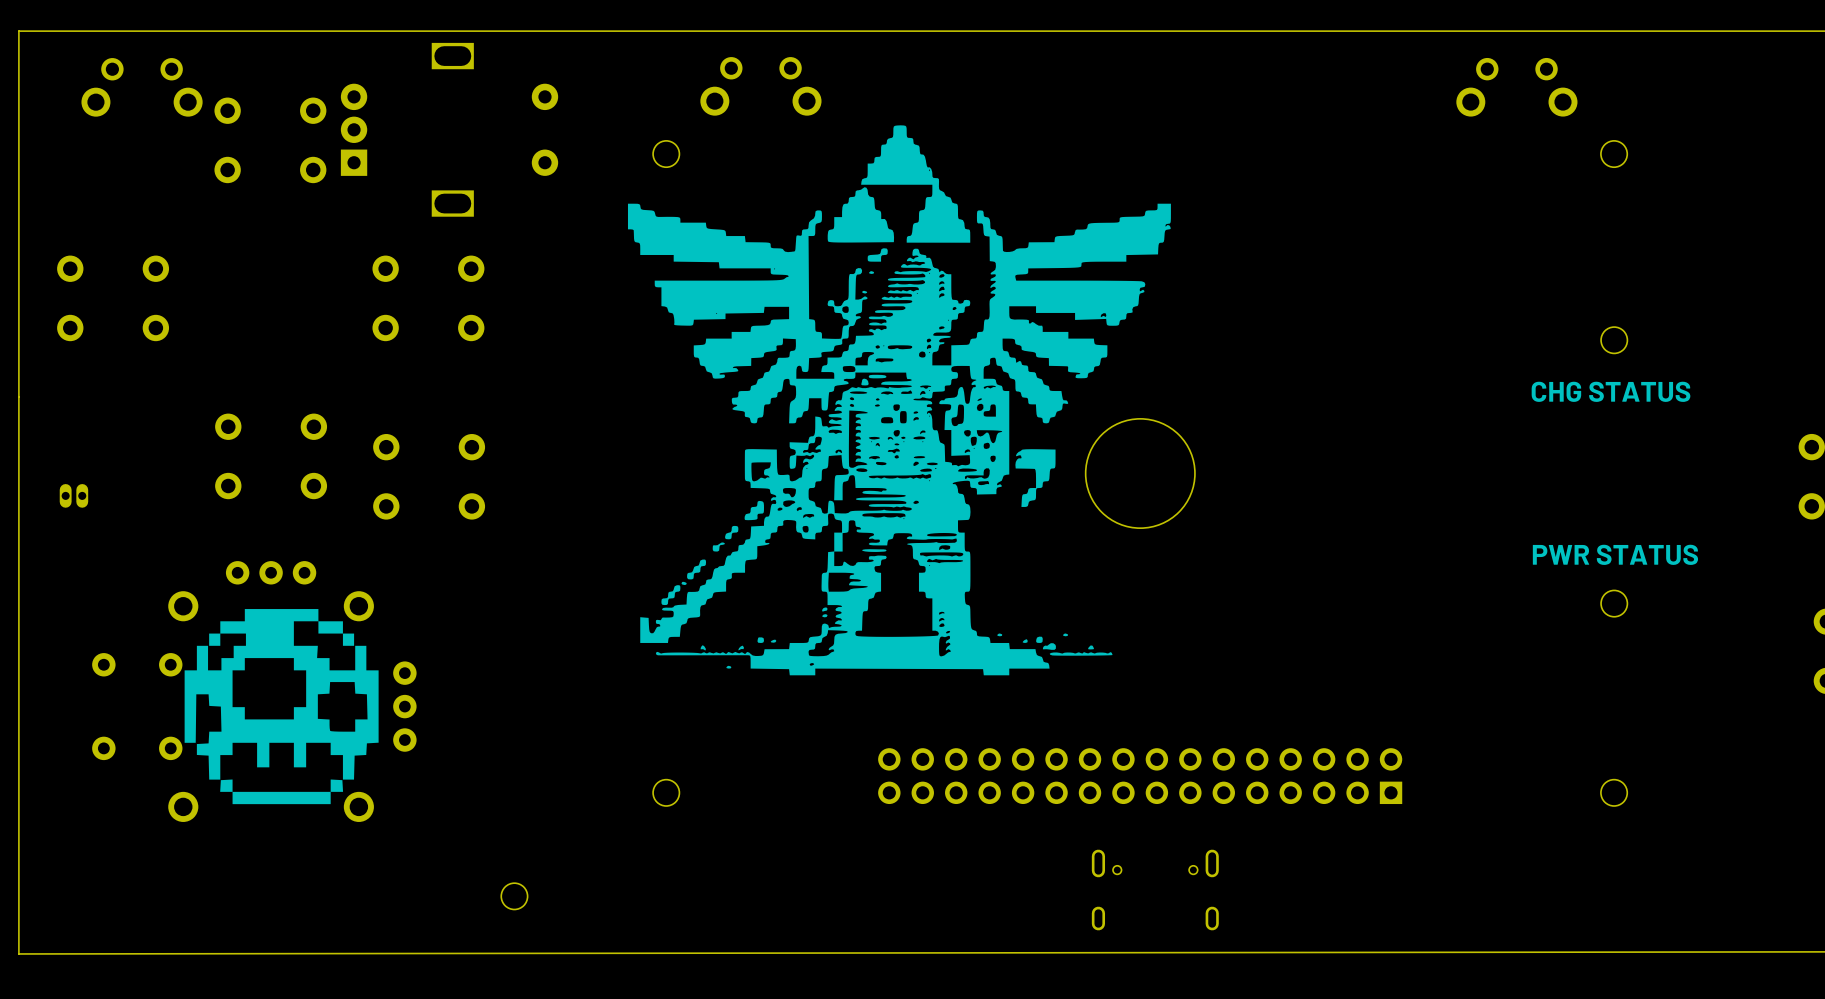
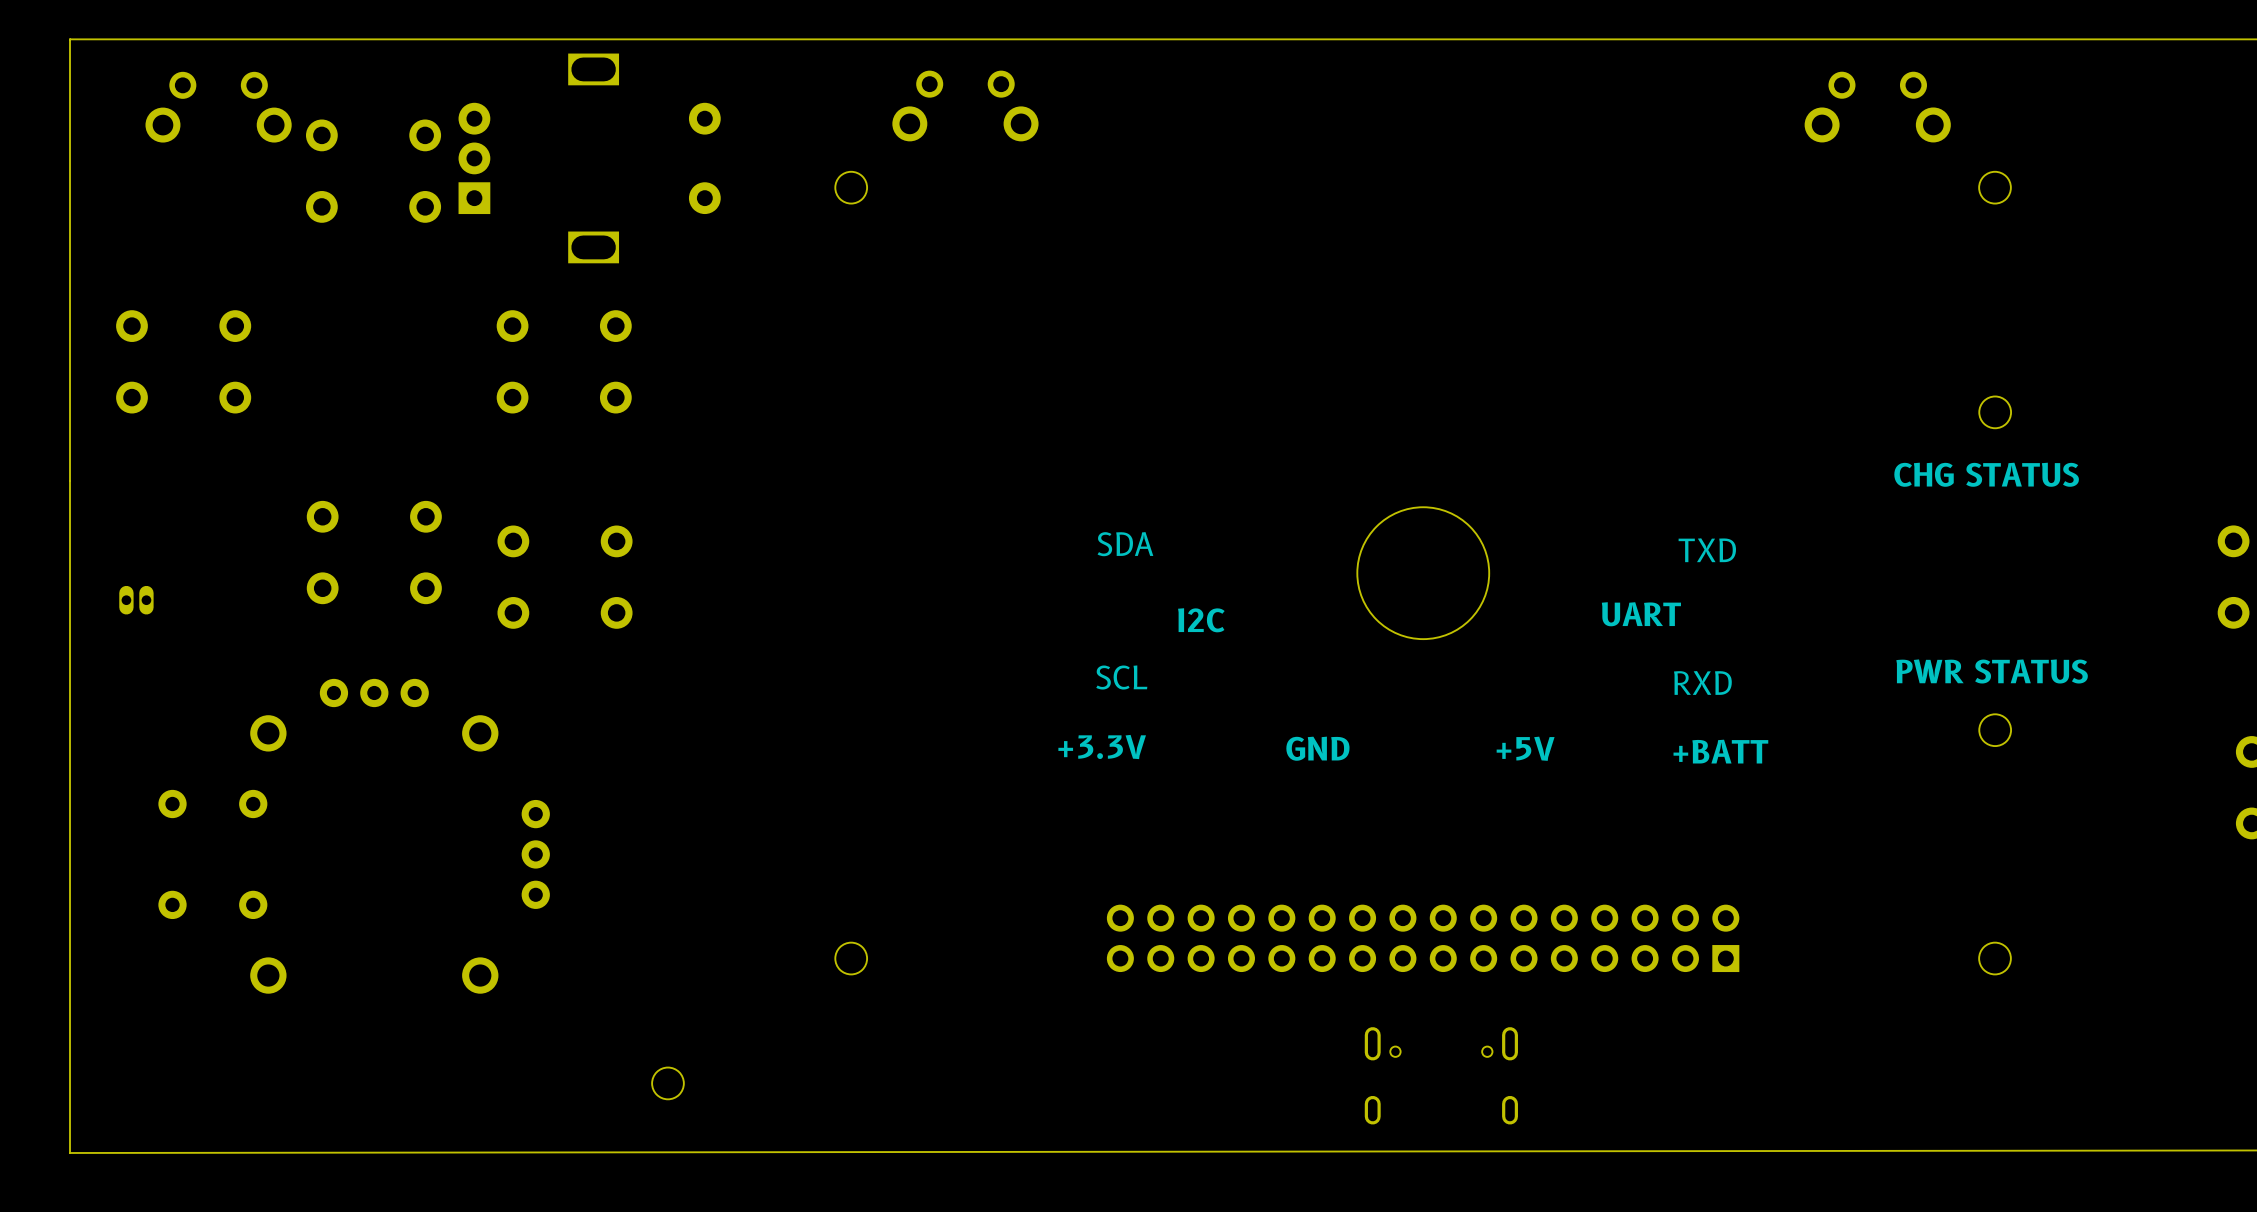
drawing: [627, 125, 1171, 676] -> none
text: none -> SDA (1125, 544)
text: none -> TXD (1707, 550)
text: none -> UART (1641, 614)
text: none -> I2C (1201, 620)
text: none -> SCL (1121, 677)
text: none -> RXD (1702, 682)
drawing: [184, 609, 379, 805] -> none
text: none -> +3.3V (1102, 747)
text: none -> GND (1317, 748)
text: none -> +5V (1525, 748)
text: none -> +BATT (1720, 751)

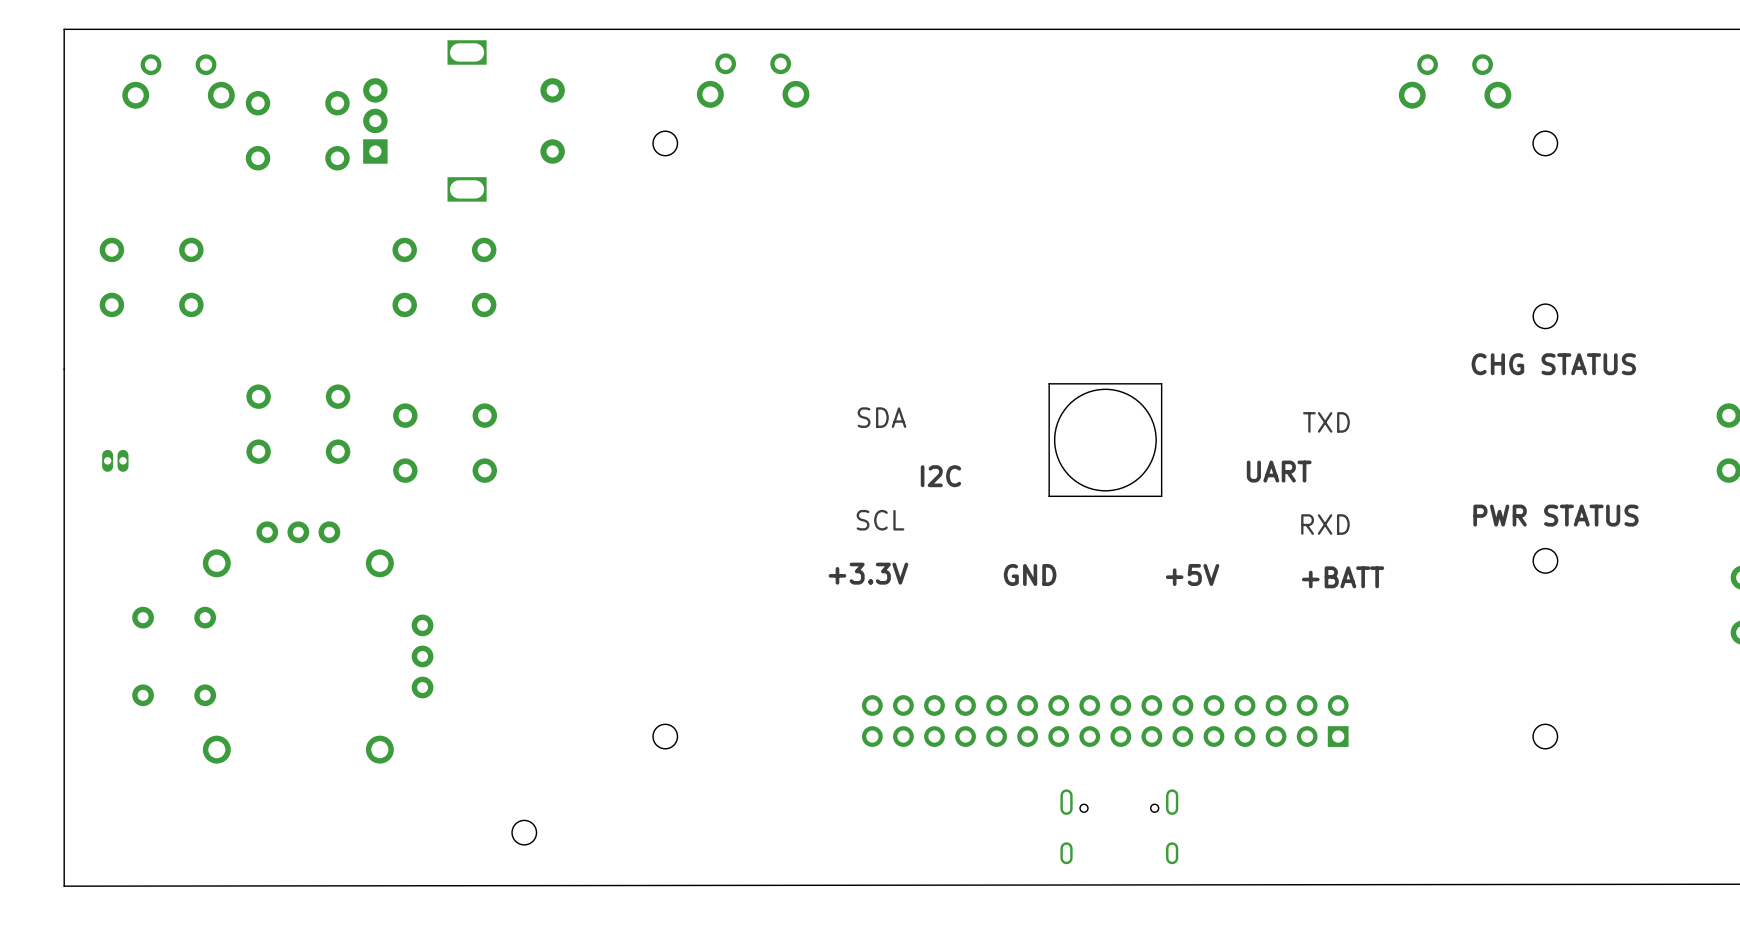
board edge: none -> (1161, 383) (1049, 383) (1049, 496) (1161, 496) (1161, 383)

